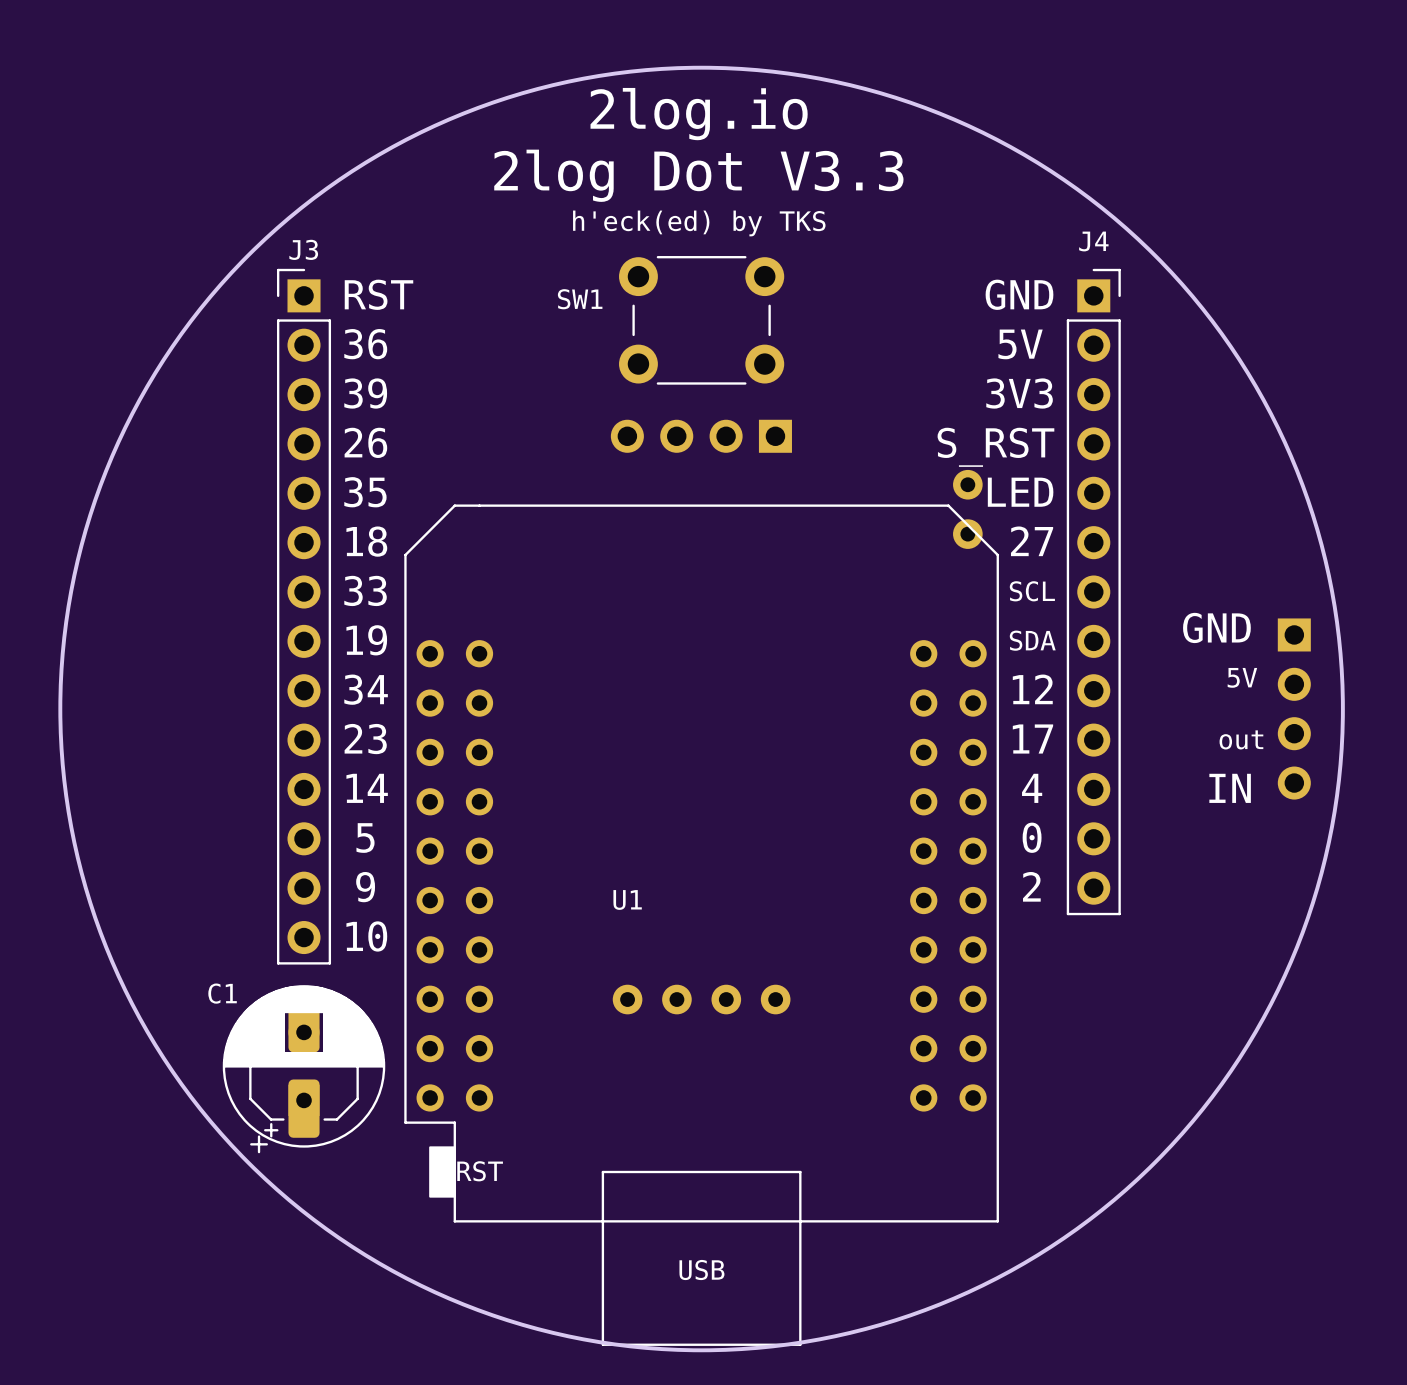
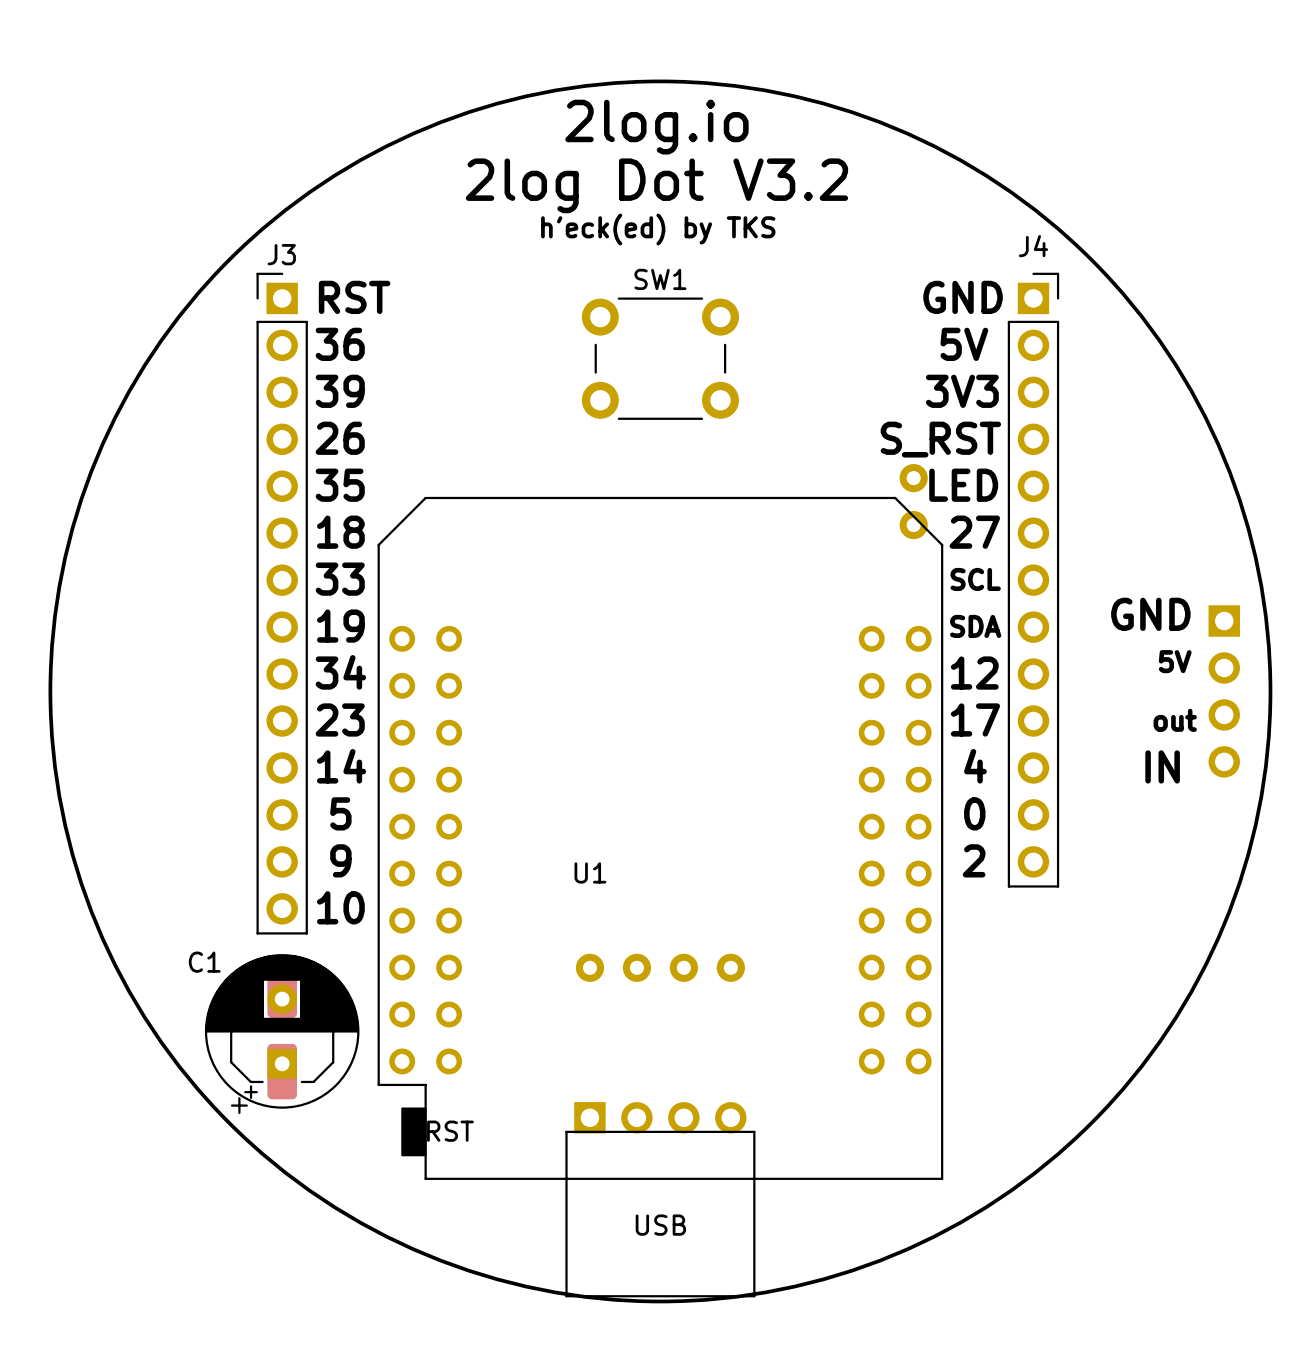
text: 2log Dot V3.3 (698, 175) -> 2log Dot V3.2 (656, 185)
SW1 name position: SW1 (580, 299) -> SW1 (660, 279)
SW1 position: (701, 320) -> (660, 358)
part: (701, 436) -> none
part: none -> (660, 1117)

